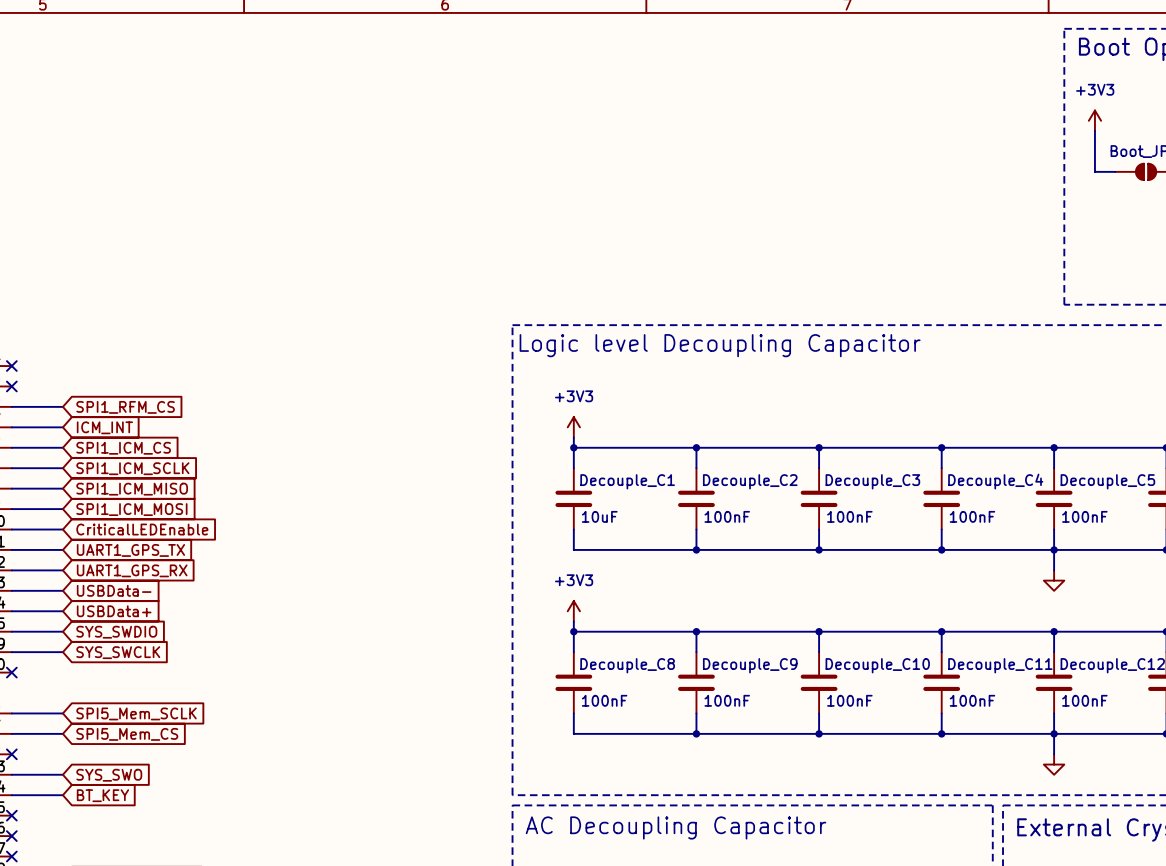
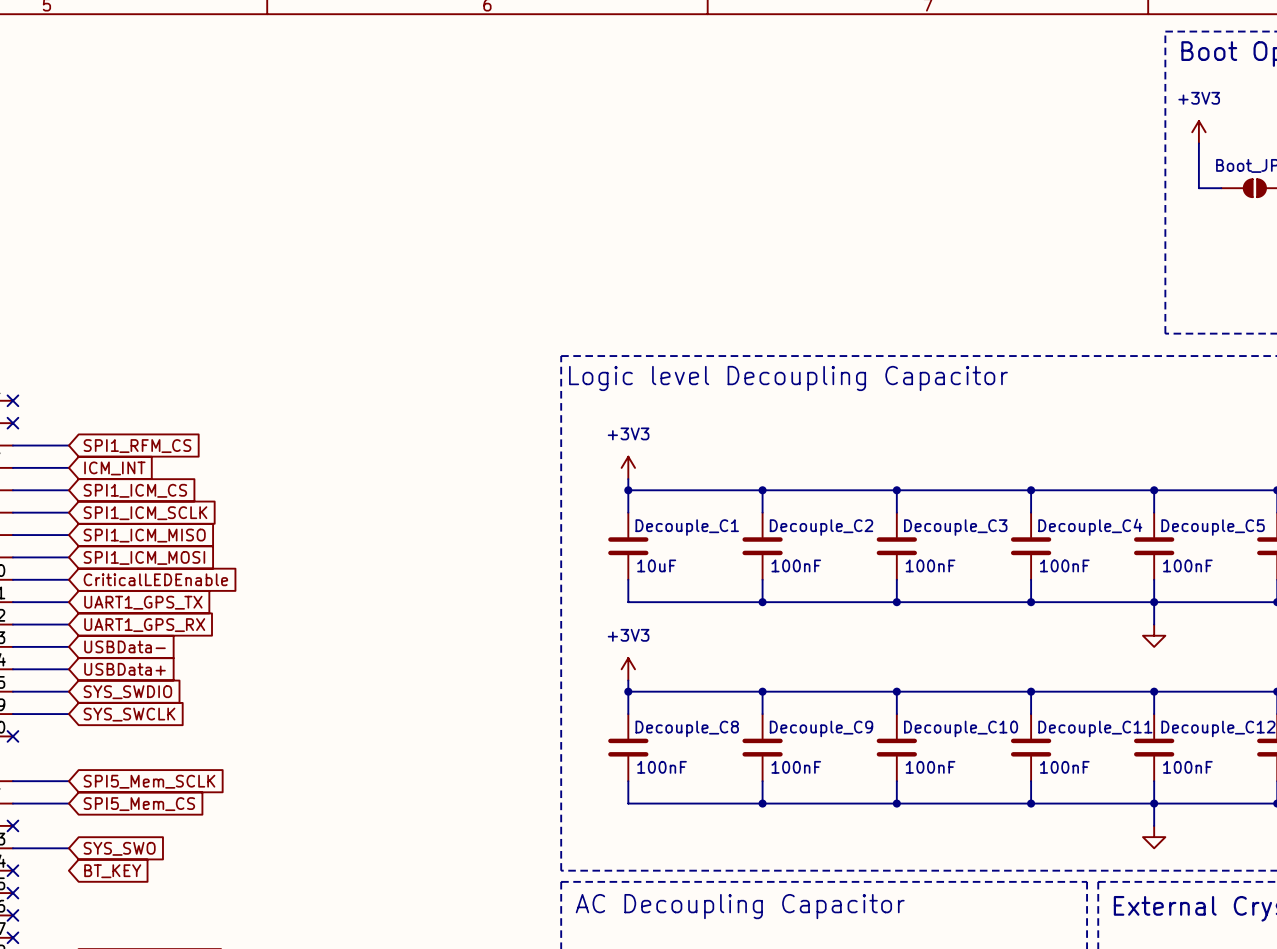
wire: (11, 795) (62, 795) -> none
no-connect mark: none -> (12, 870)

